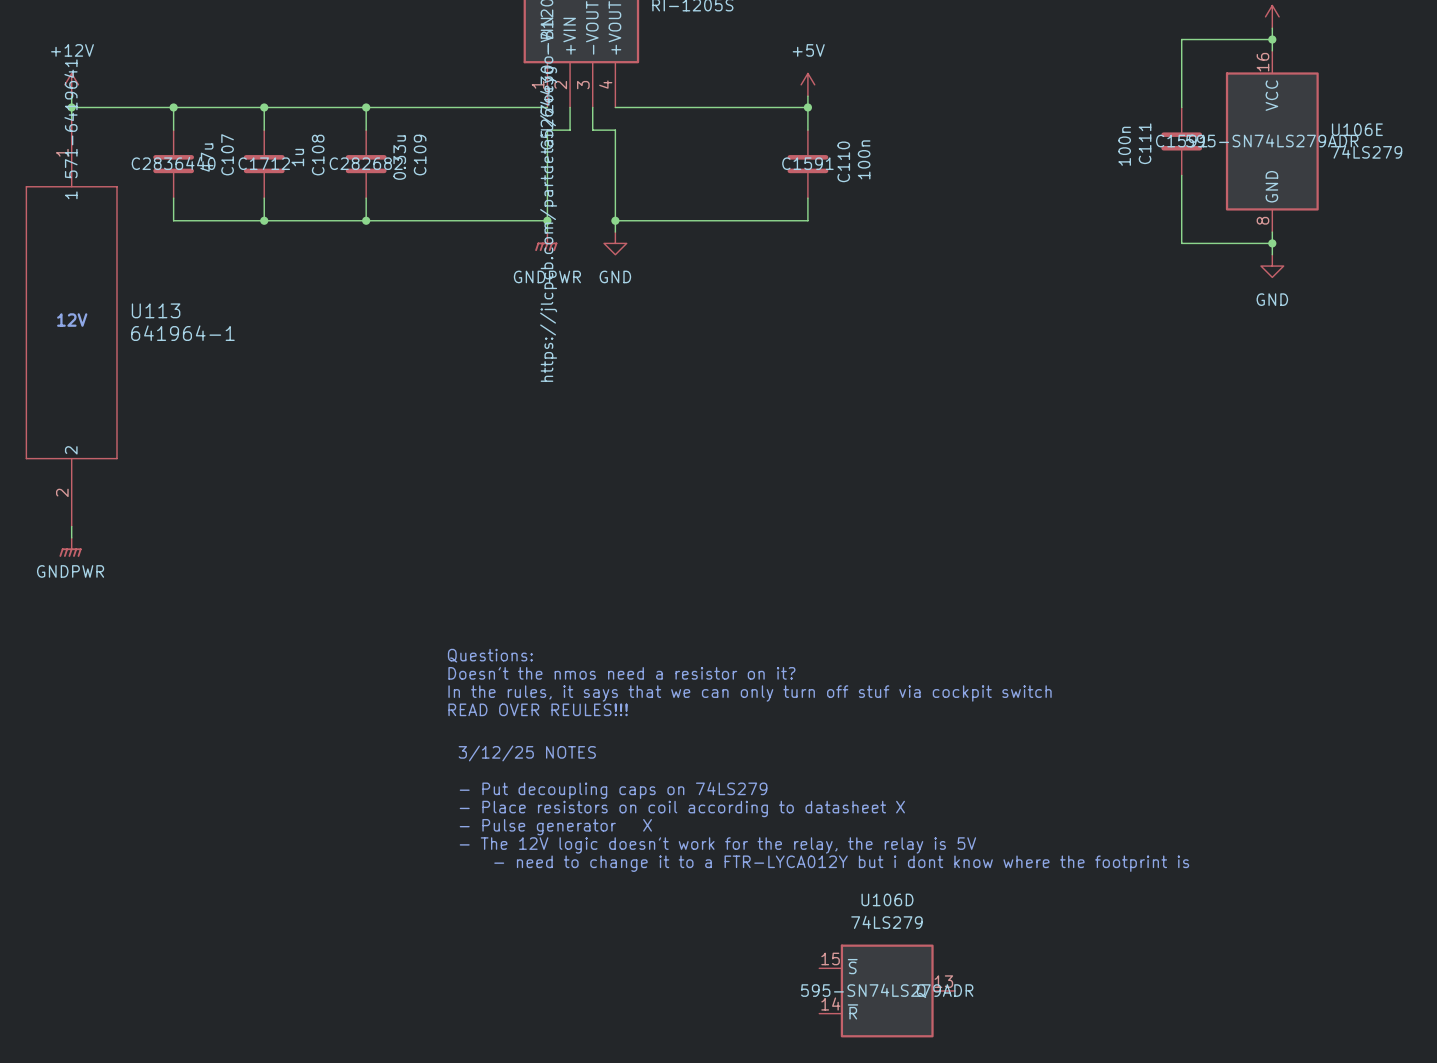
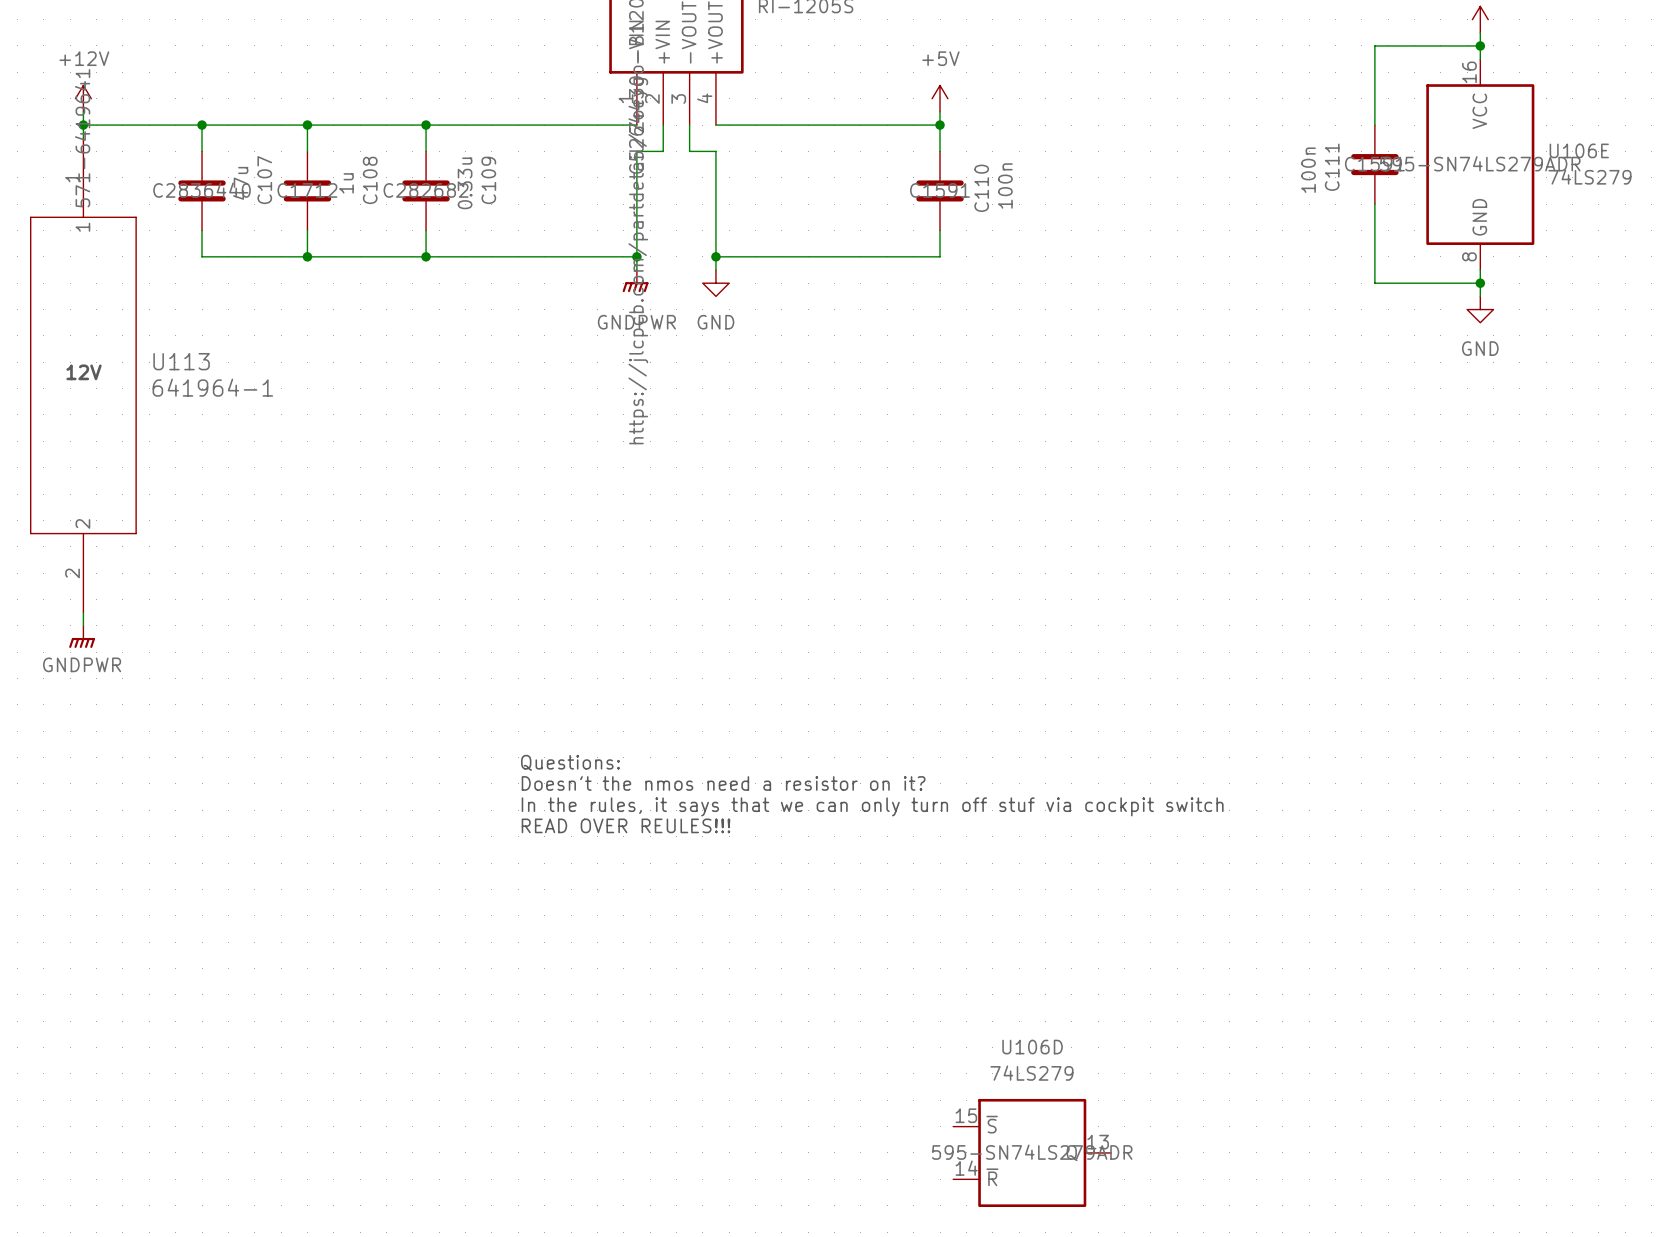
text: 3/12/25 NOTES (527, 753) -> none
text: - Put decoupling caps on 74LS279 (613, 790) -> none
text: - Place resistors on coil according to datasheet X (682, 808) -> none
text: - Pulse generator X (555, 827) -> none
text: - The 12V logic doesn't work for the relay, the relay is 5V (717, 845) -> none
text: - need to change it to a FTR-LYCA012Y but i dont know where the footprint is (841, 863) -> none

